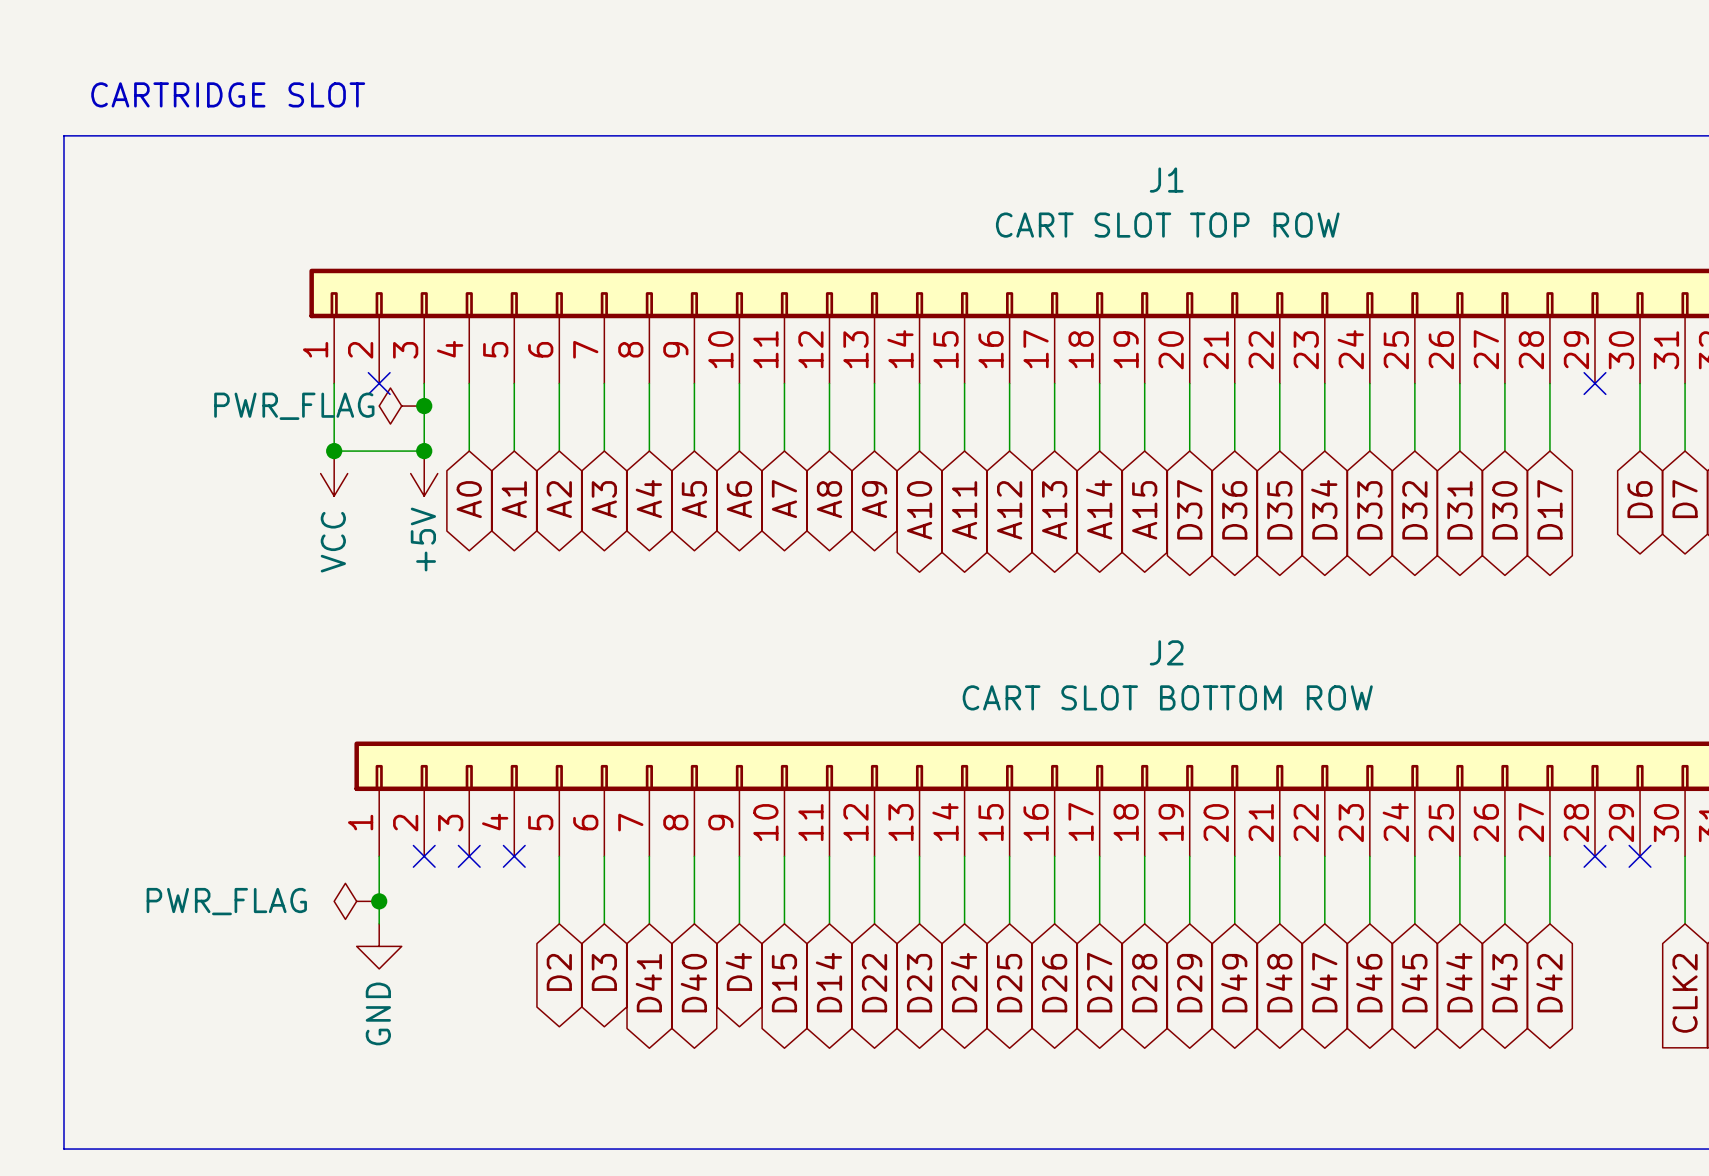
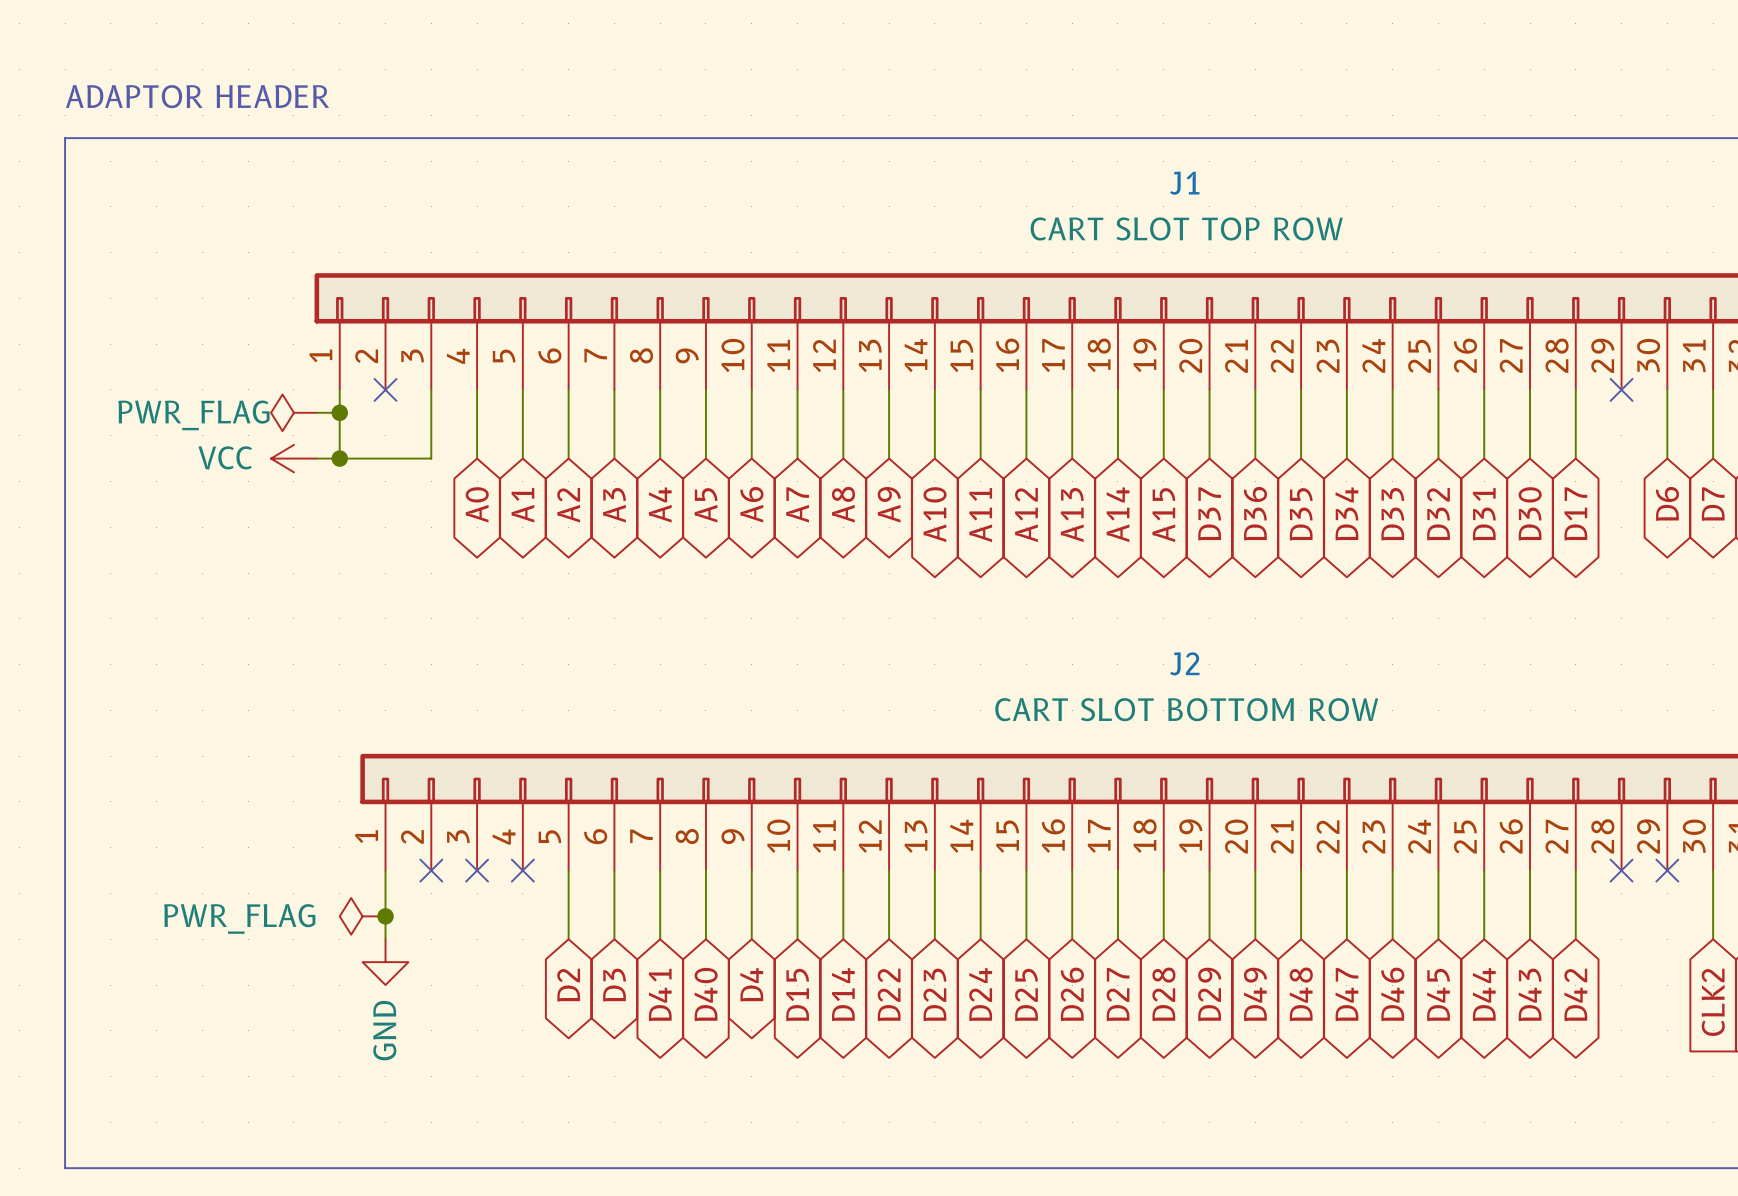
text: none -> ADAPTOR HEADER (197, 96)
text: CARTRIDGE SLOT (228, 94) -> none
wire: none -> (316, 412) (339, 412)
junction: none -> (339, 412)
power symbol position: PWR_FLAG (401, 406) -> PWR_FLAG (293, 412)
junction: (424, 406) -> none
wire: none -> (316, 458) (339, 458)
junction: (424, 451) -> none
power symbol rotation: 0° (334, 473) -> 90° clockwise (293, 458)
power symbol position: VCC (334, 473) -> VCC (293, 458)
power symbol: +5V (424, 473) -> none

